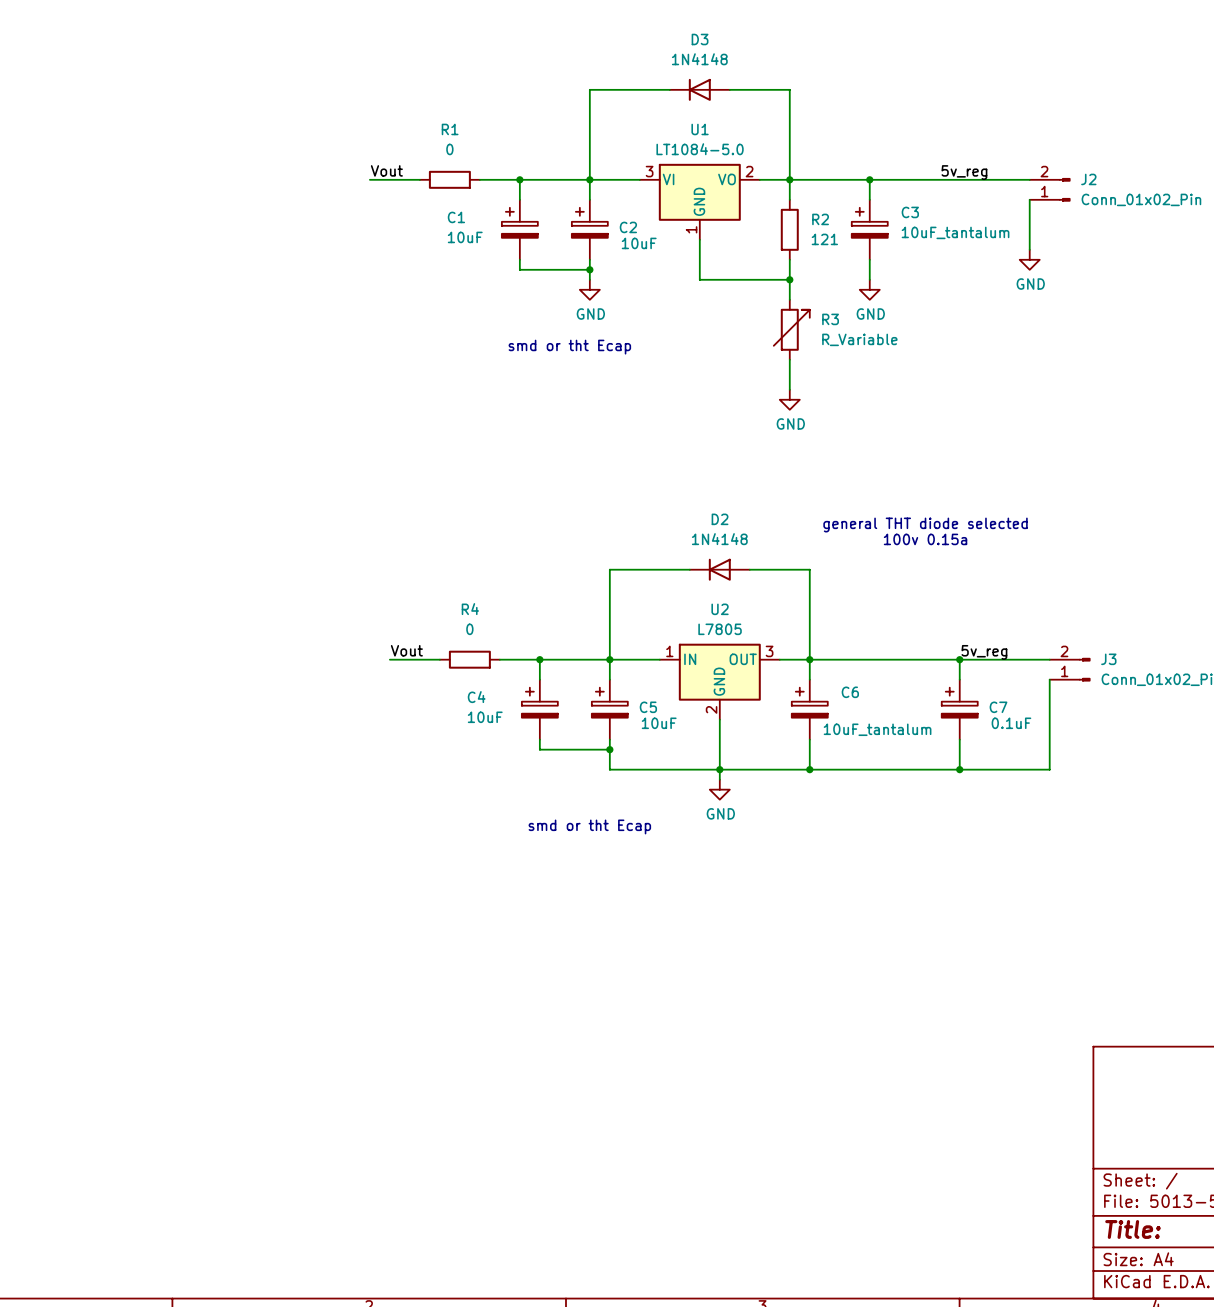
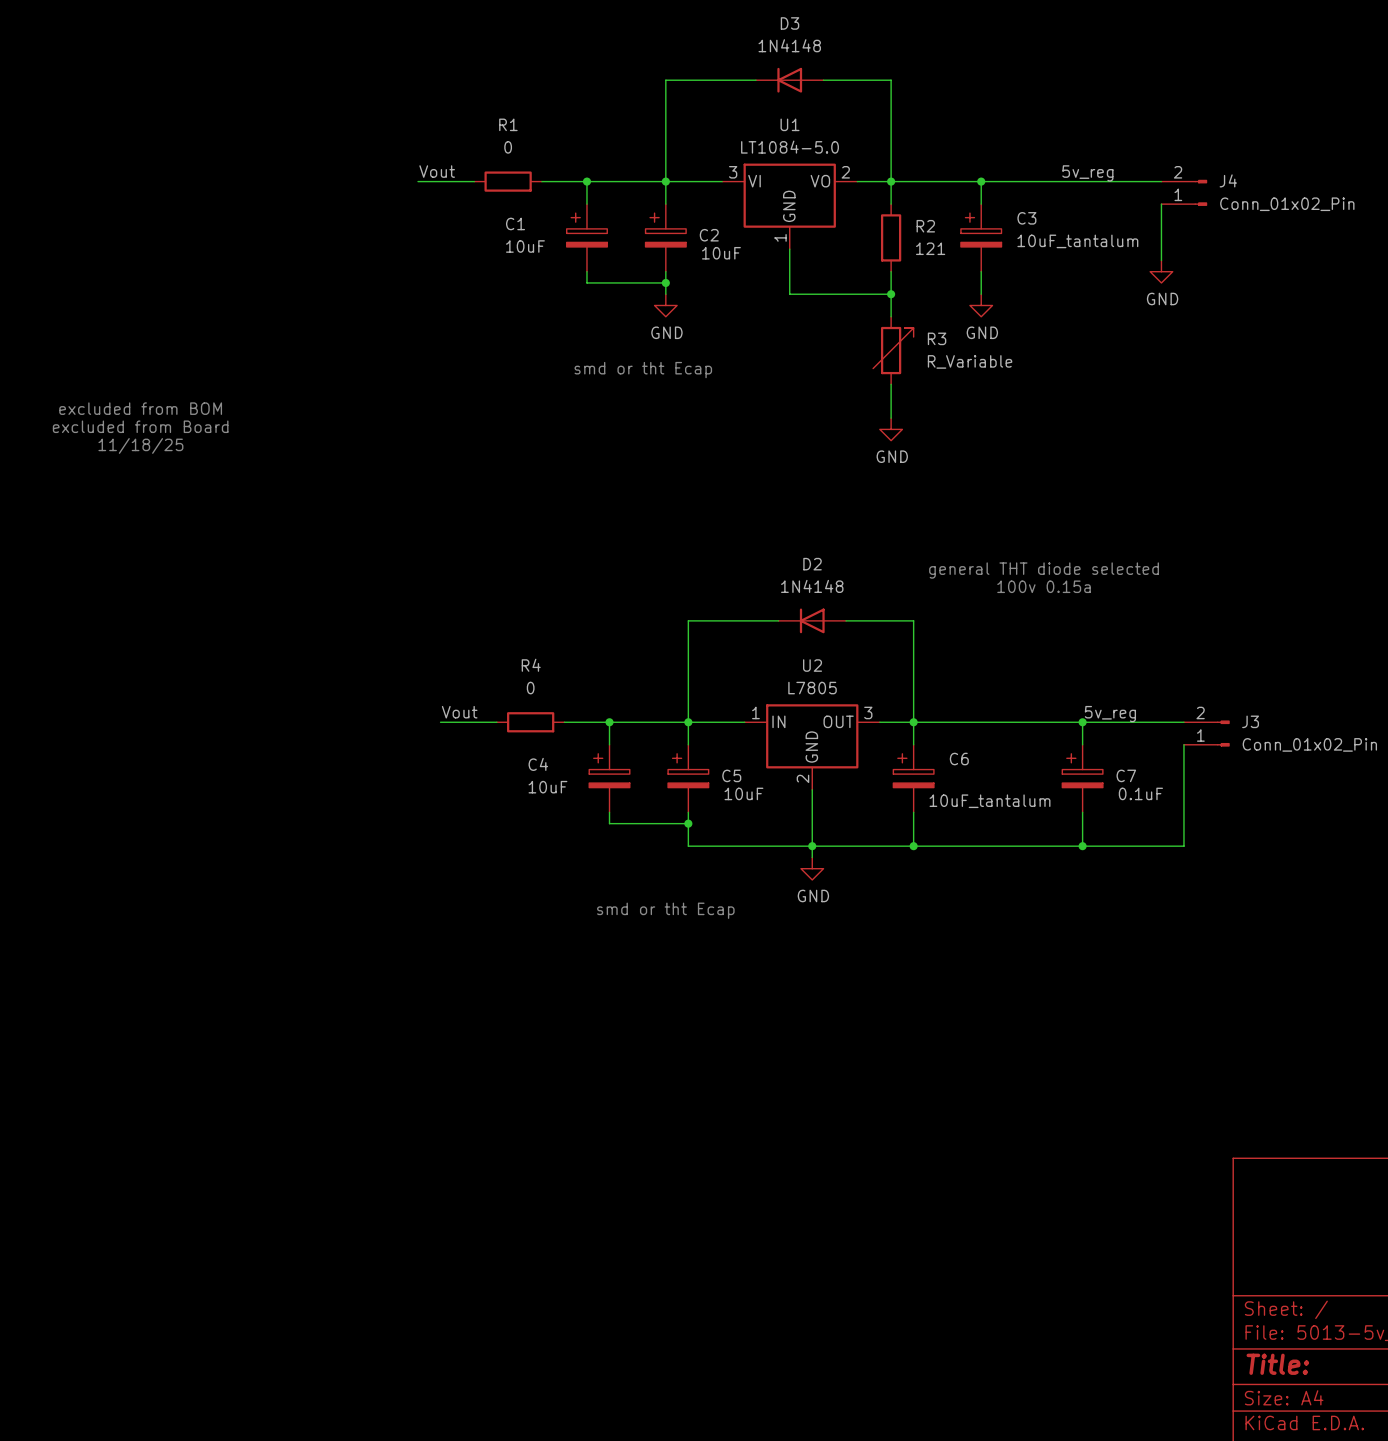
J2 name: J2 (1088, 179) -> J4 (1228, 180)
text: none -> excluded from BOM (140, 408)
text: none -> excluded from Board (140, 426)
text: none -> 11/18/25 (140, 445)

